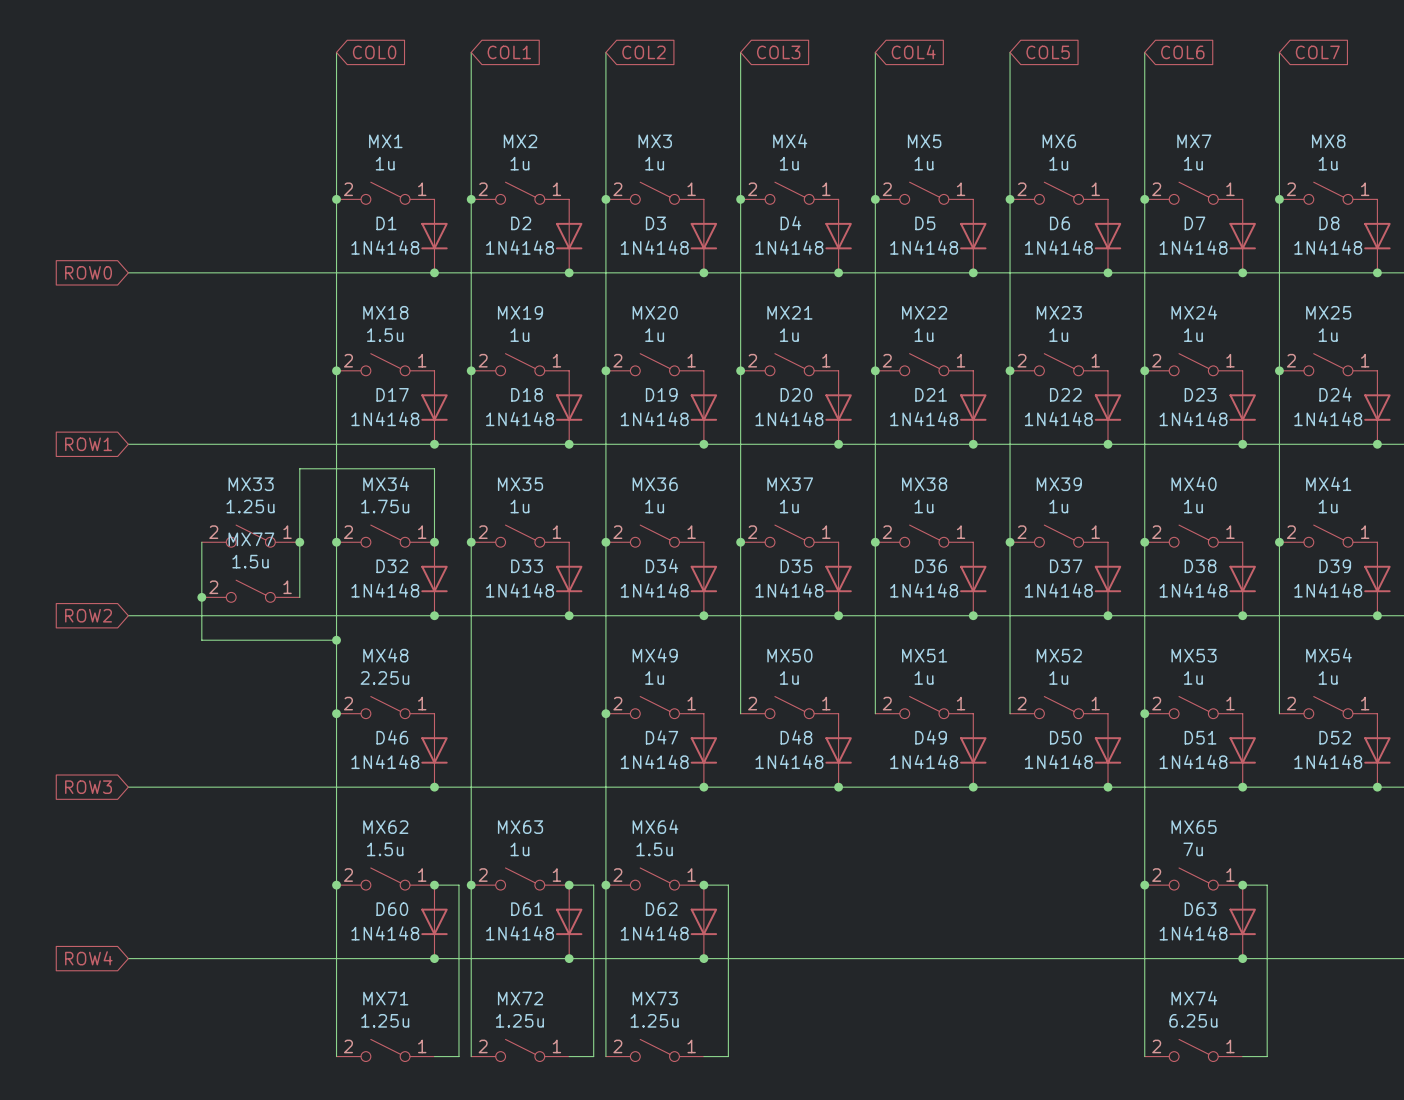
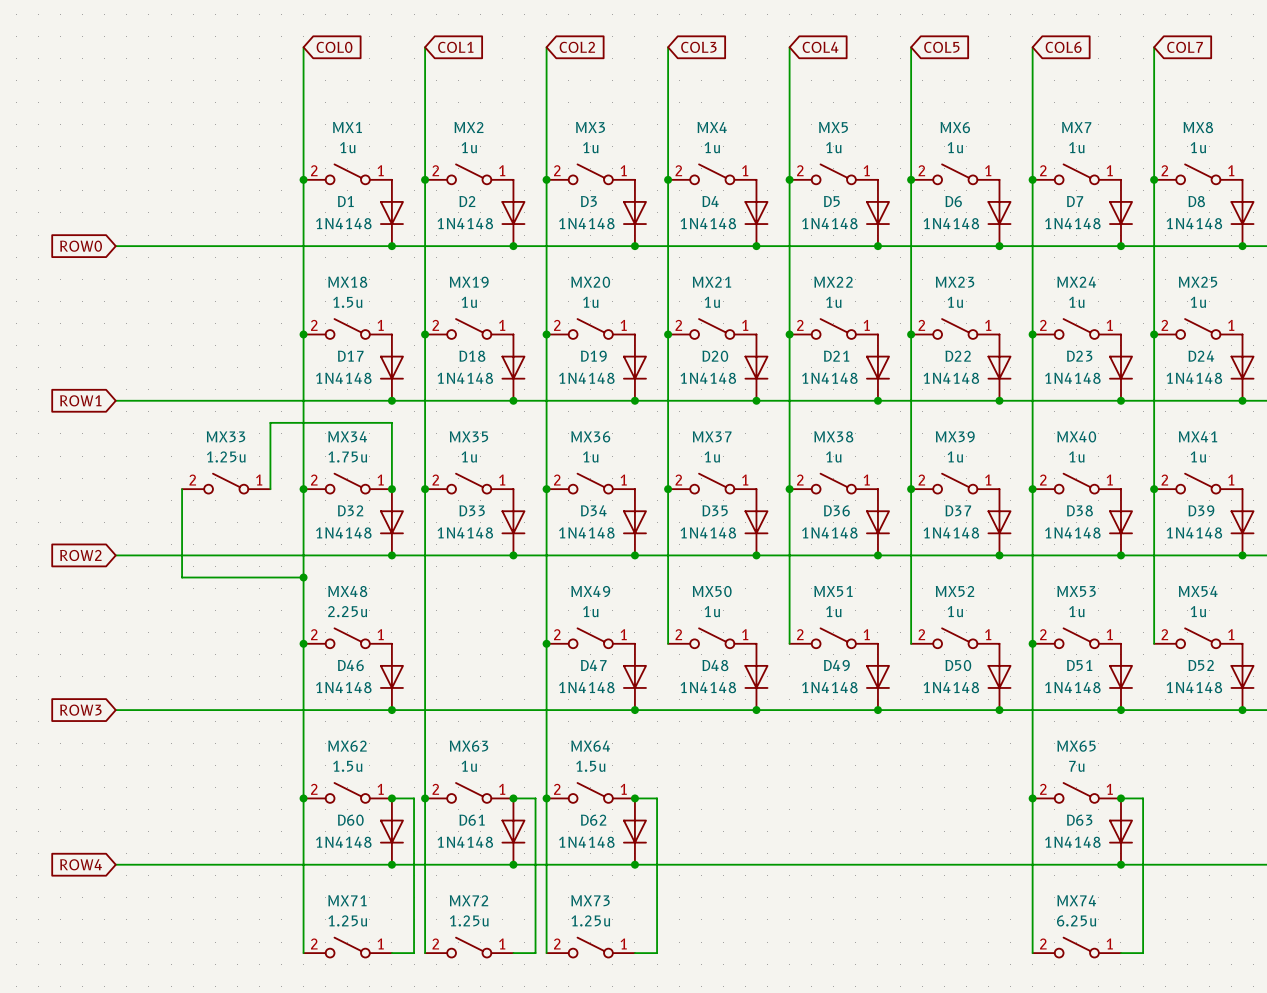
wire: (299, 542) (299, 597) -> none
junction: (299, 542) -> none
MX77: 1.5u (250, 591) -> none
junction: (201, 597) -> none

